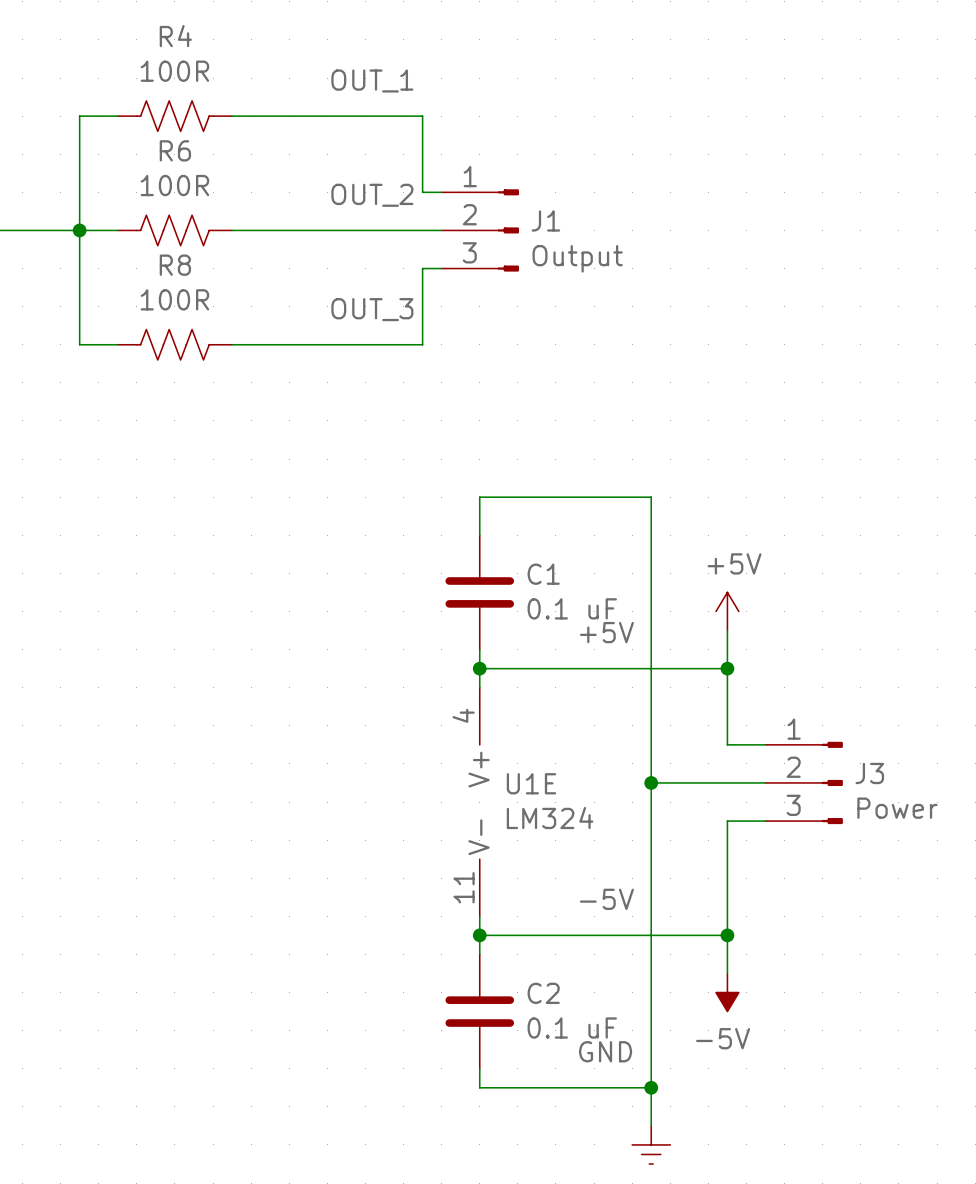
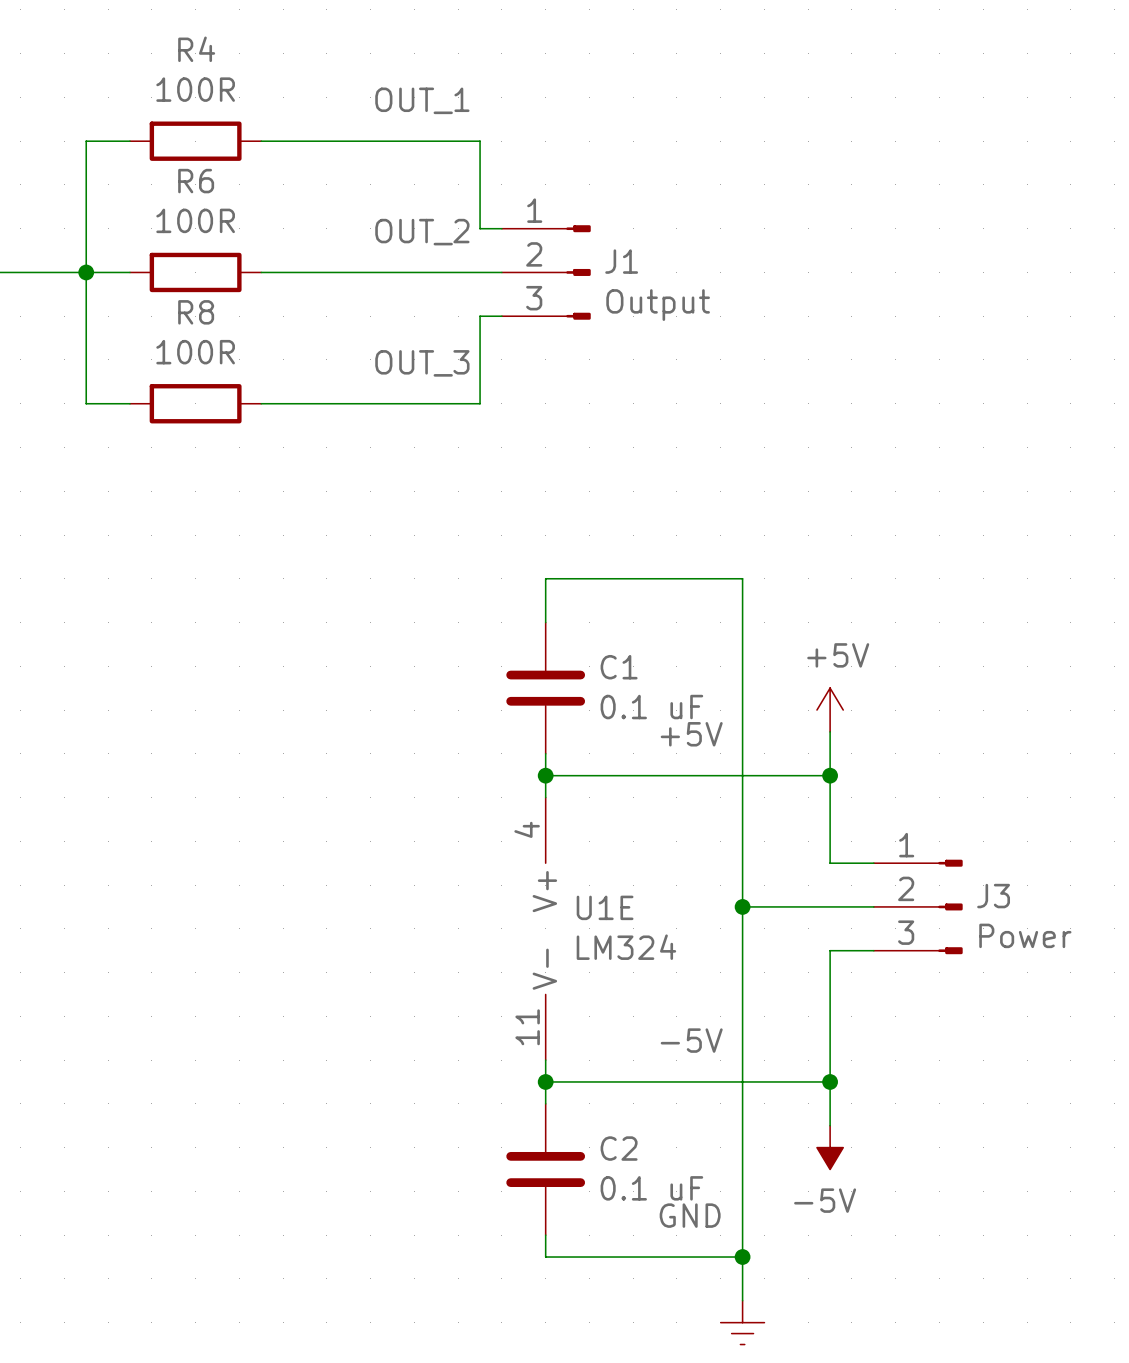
R4 symbol: [117, 100, 233, 132] -> [129, 121, 262, 161]
R6 symbol: [117, 215, 233, 246] -> [129, 252, 262, 293]
R8 symbol: [117, 329, 233, 361] -> [129, 384, 262, 424]

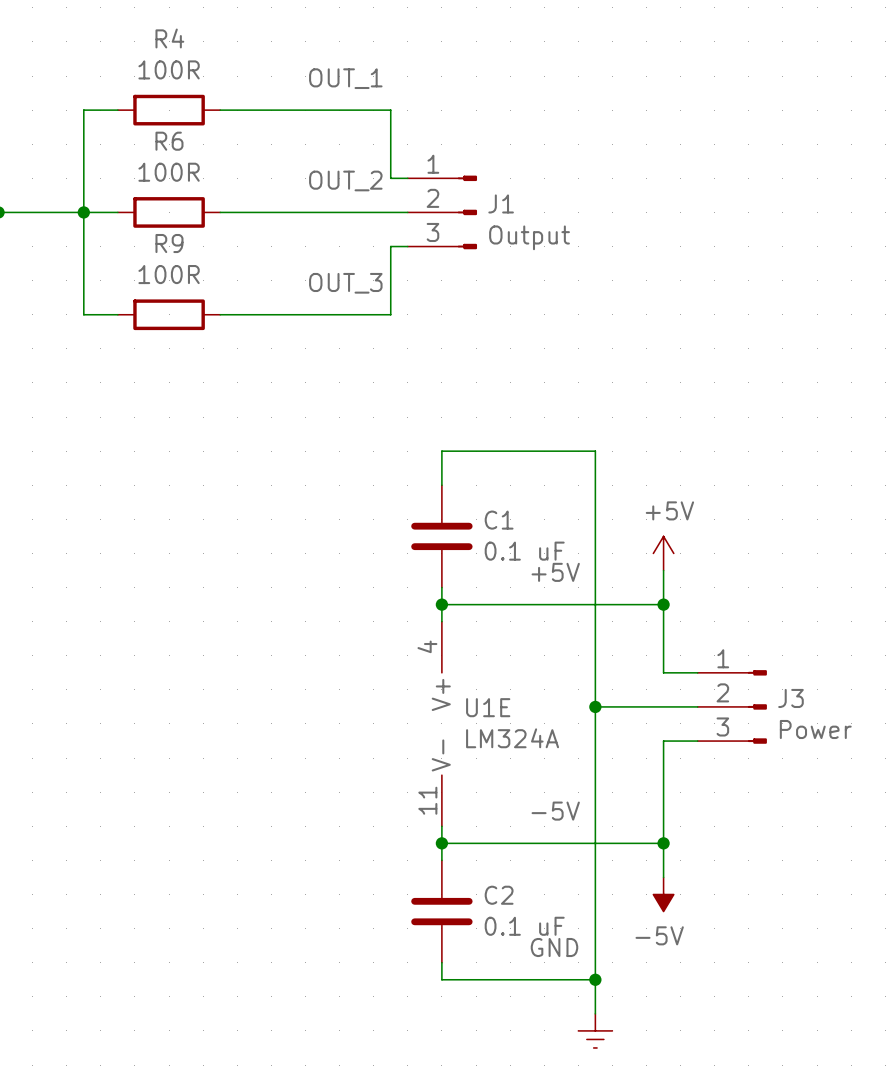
R8 name: R8 (196, 312) -> R9 (169, 243)
U1E value: LM324 (626, 947) -> LM324A (512, 738)

